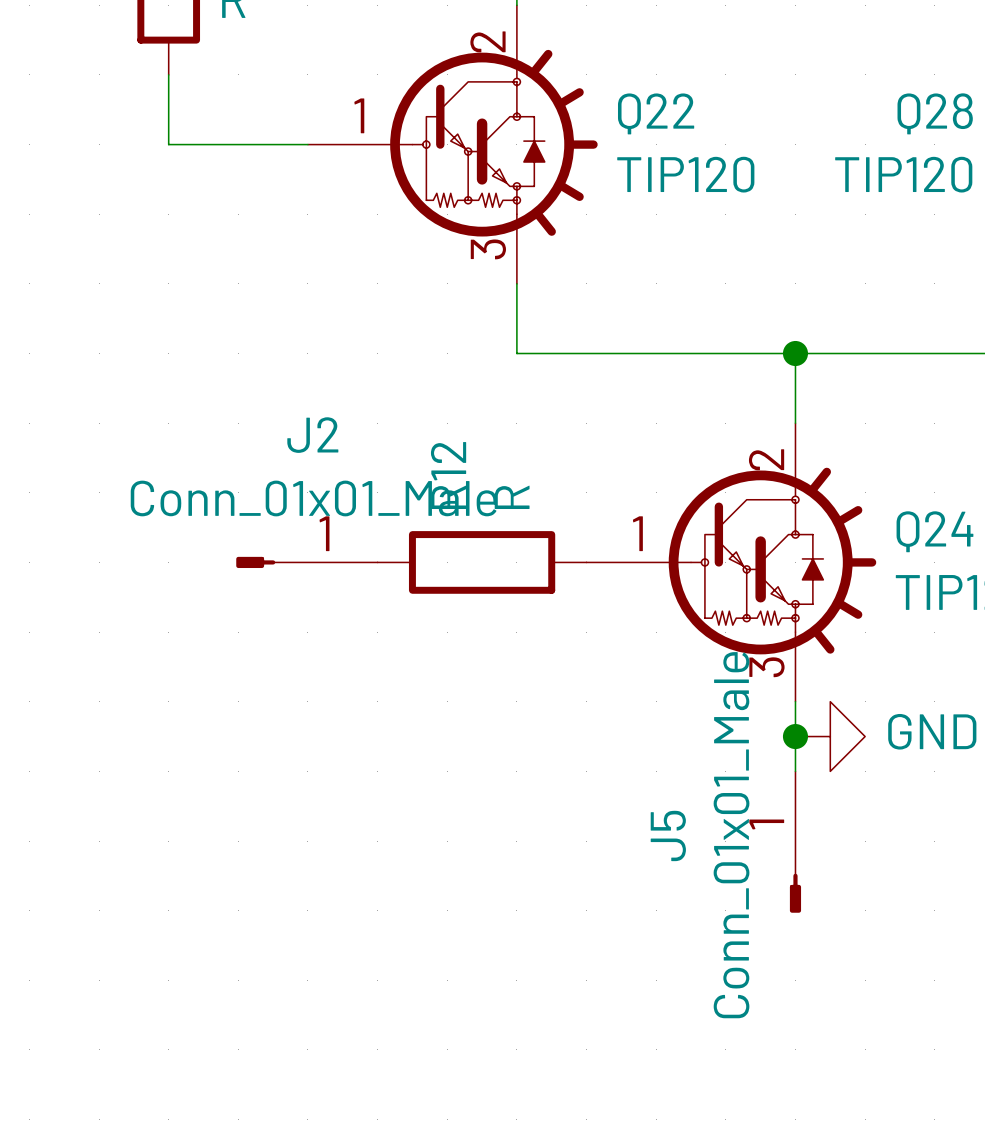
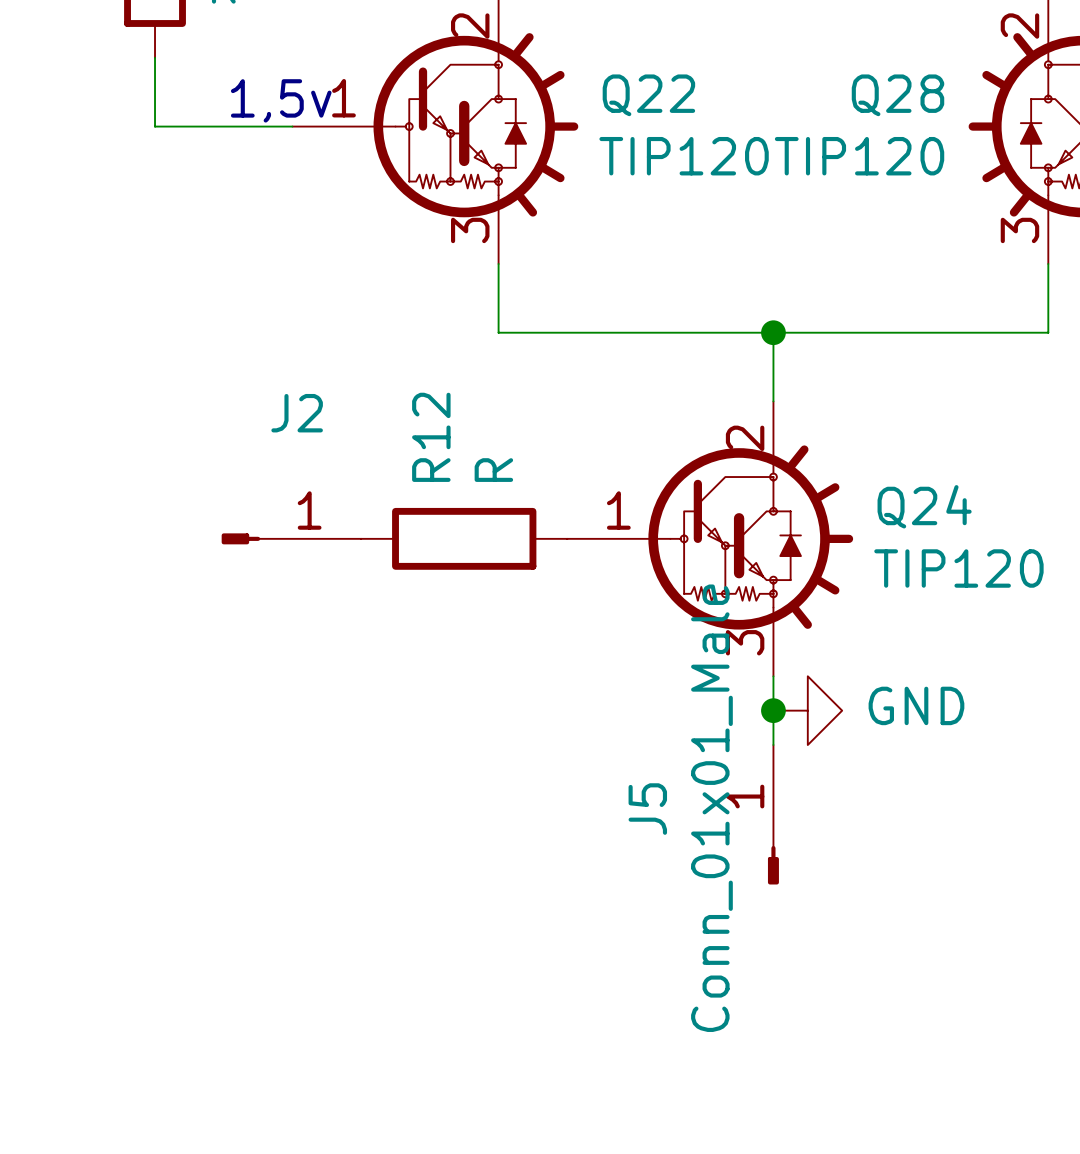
text: none -> 1,5v (281, 100)
J2 value: Conn_01x01_Male (313, 498) -> none

